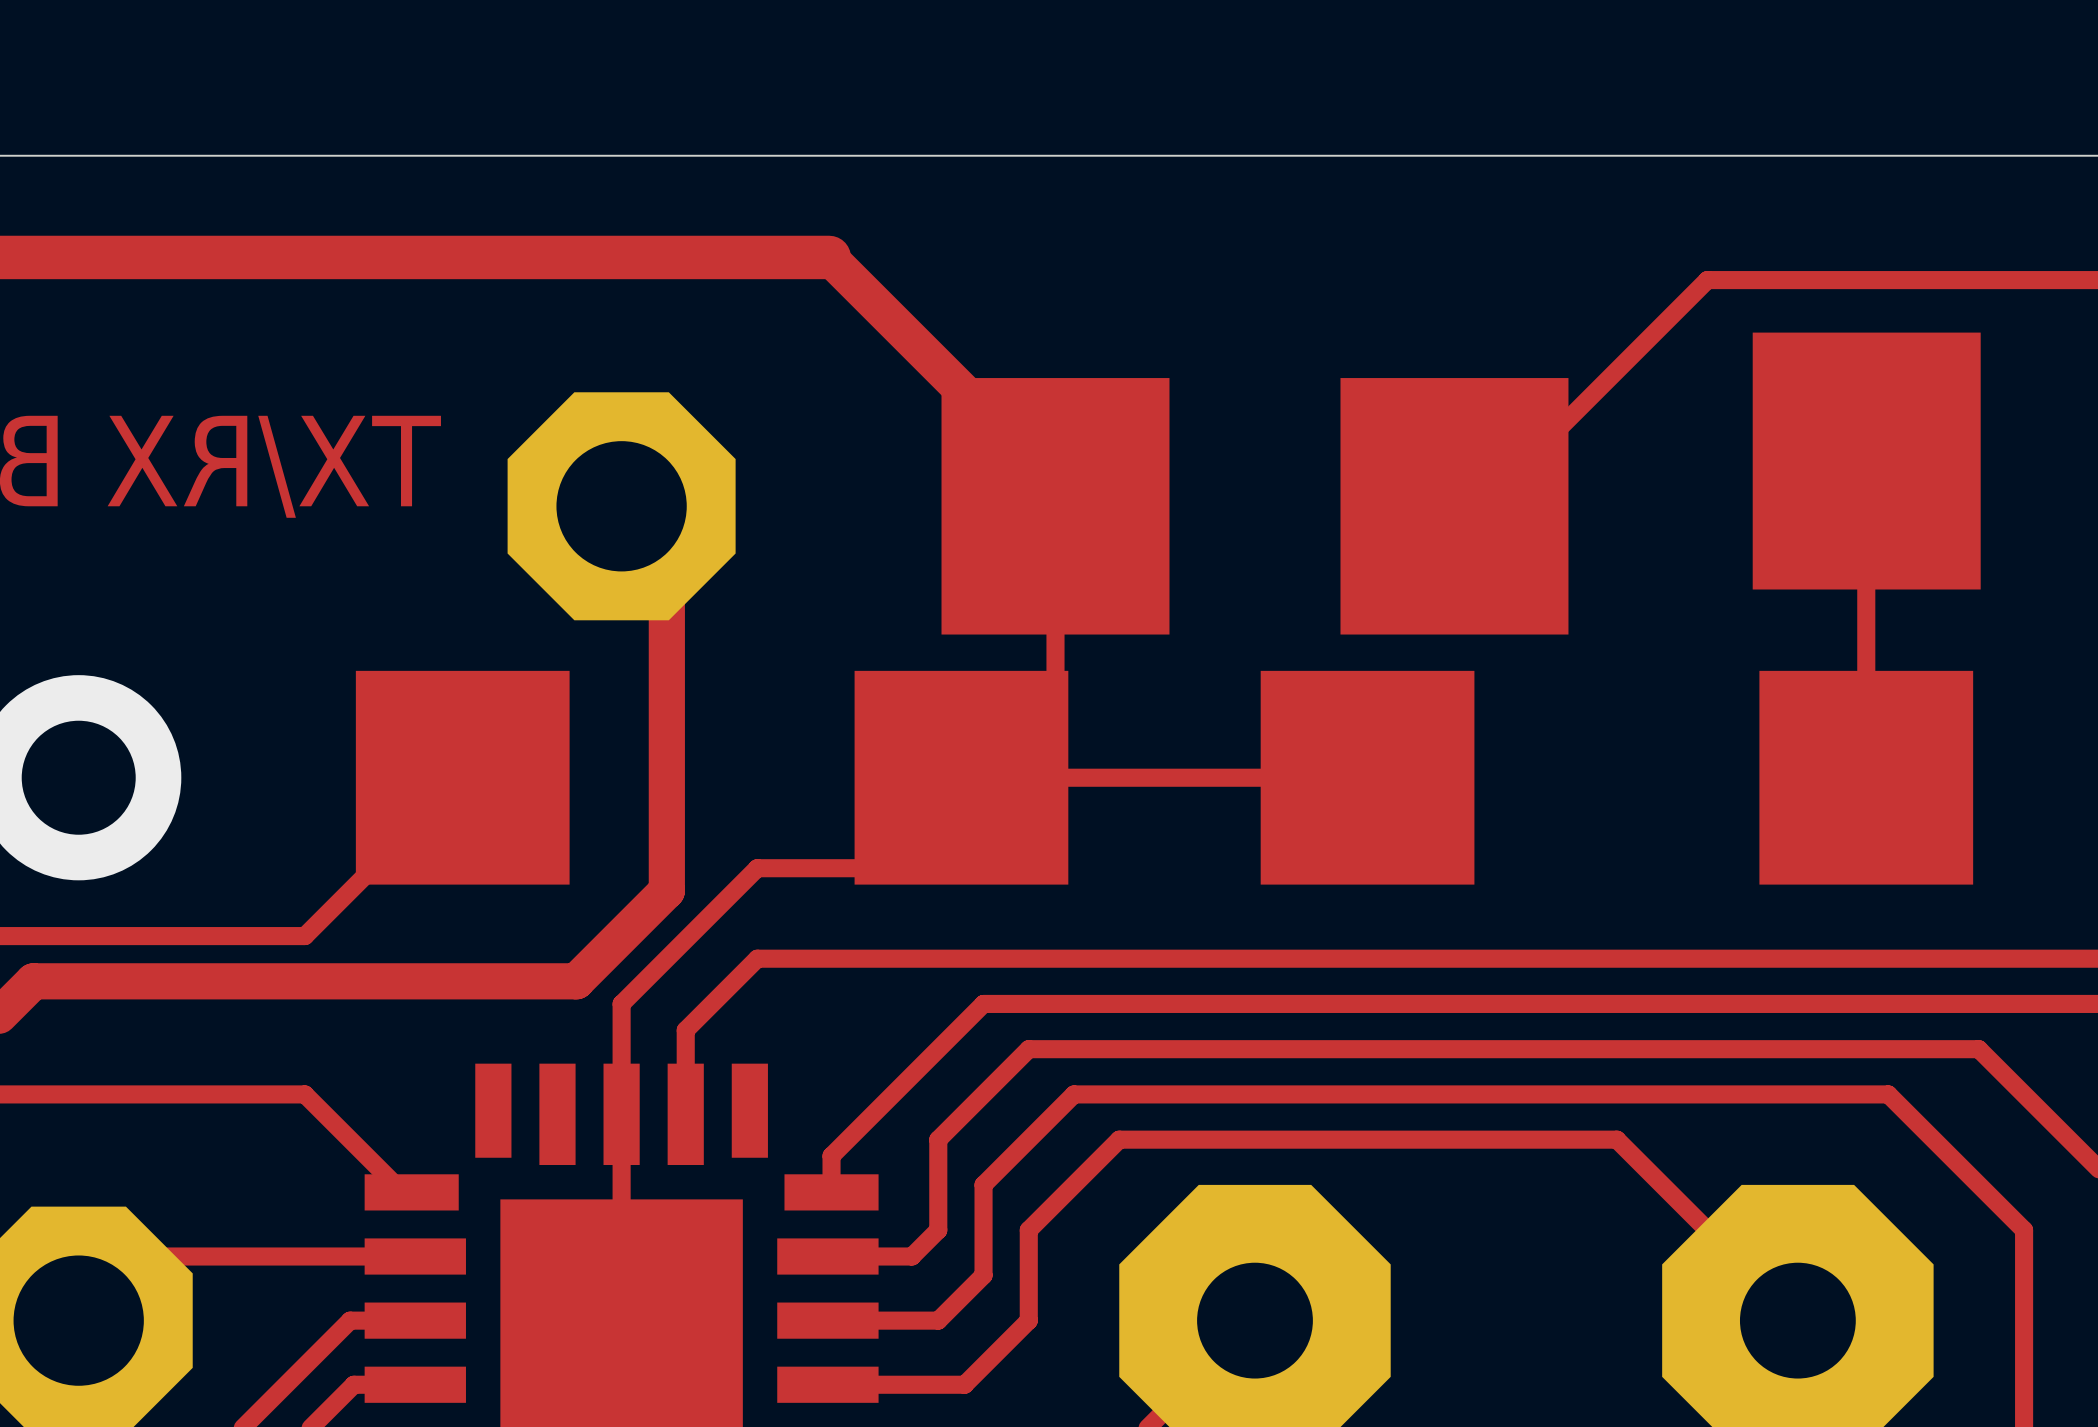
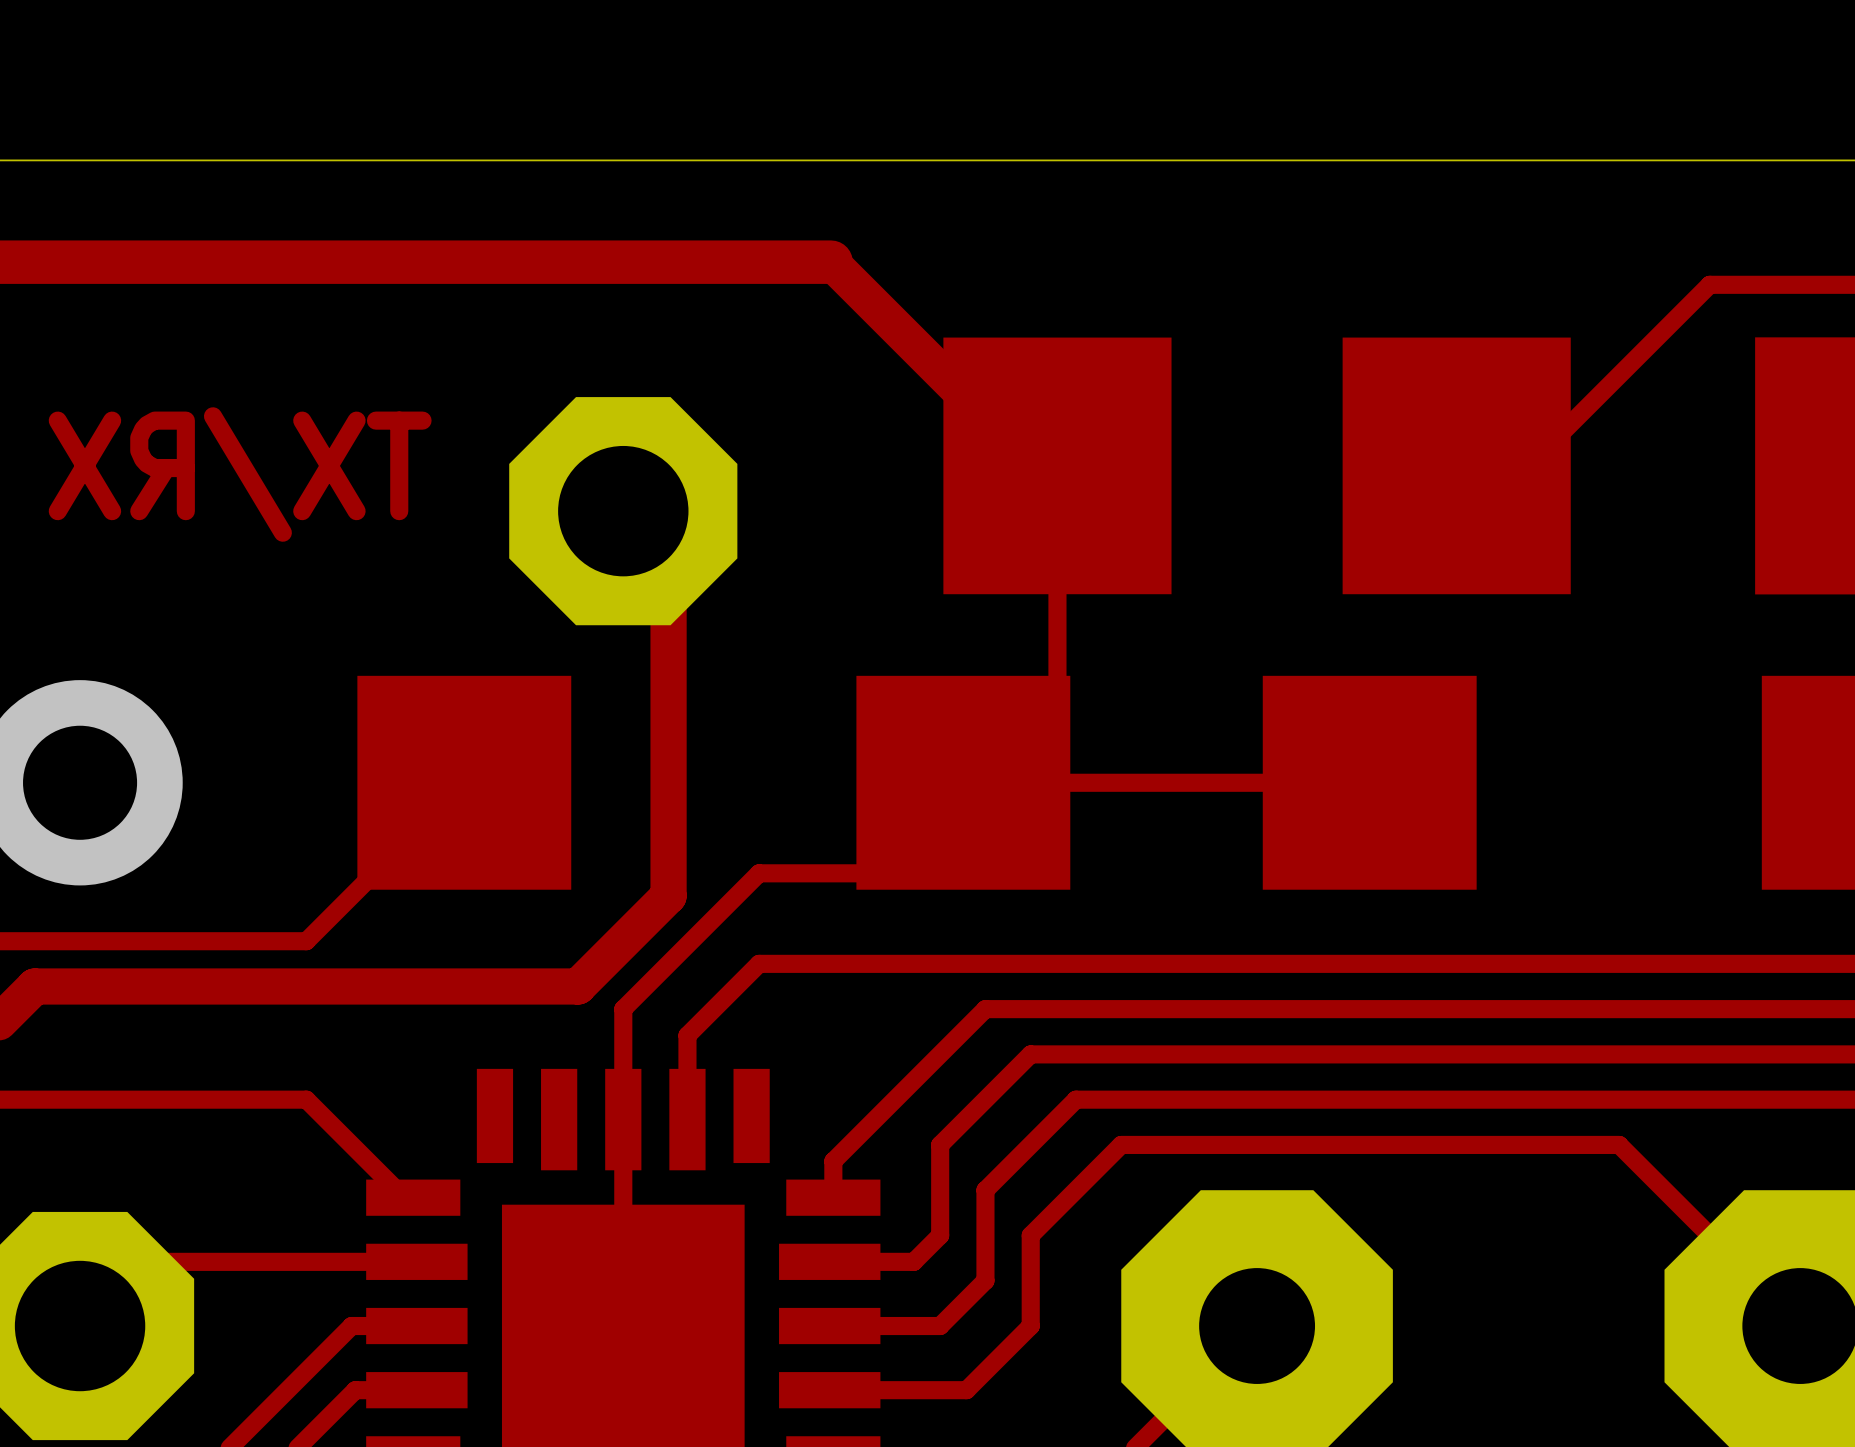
part position: (1254, 506) -> (1257, 465)

